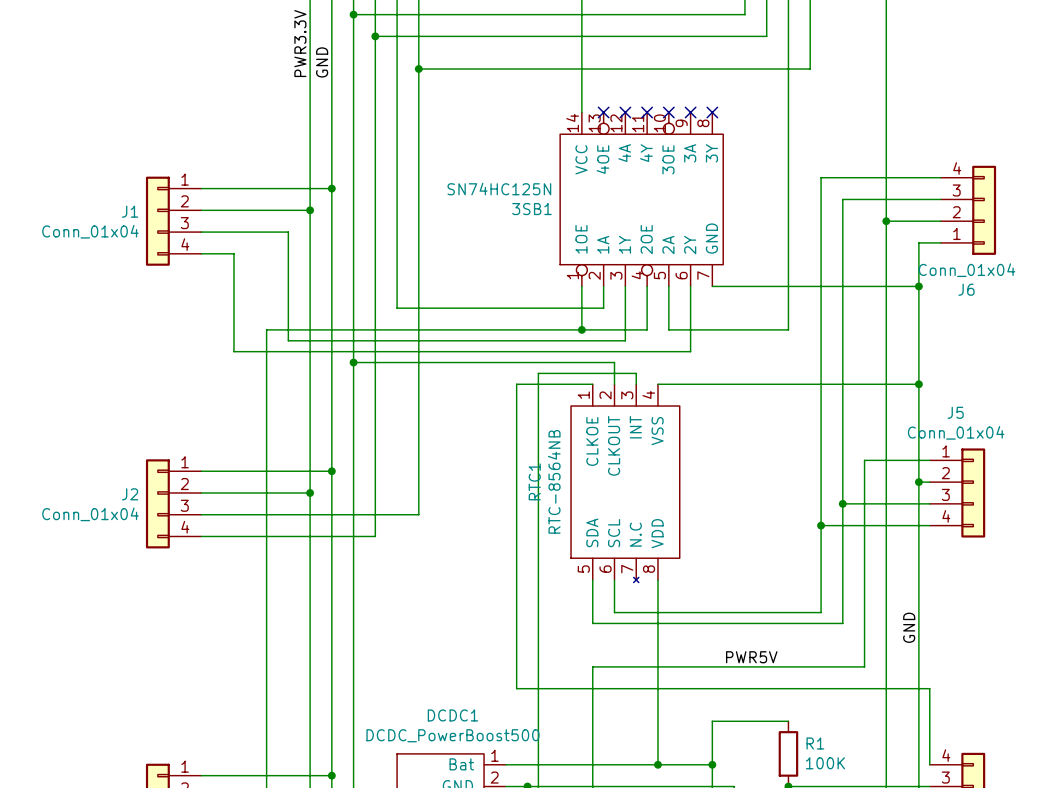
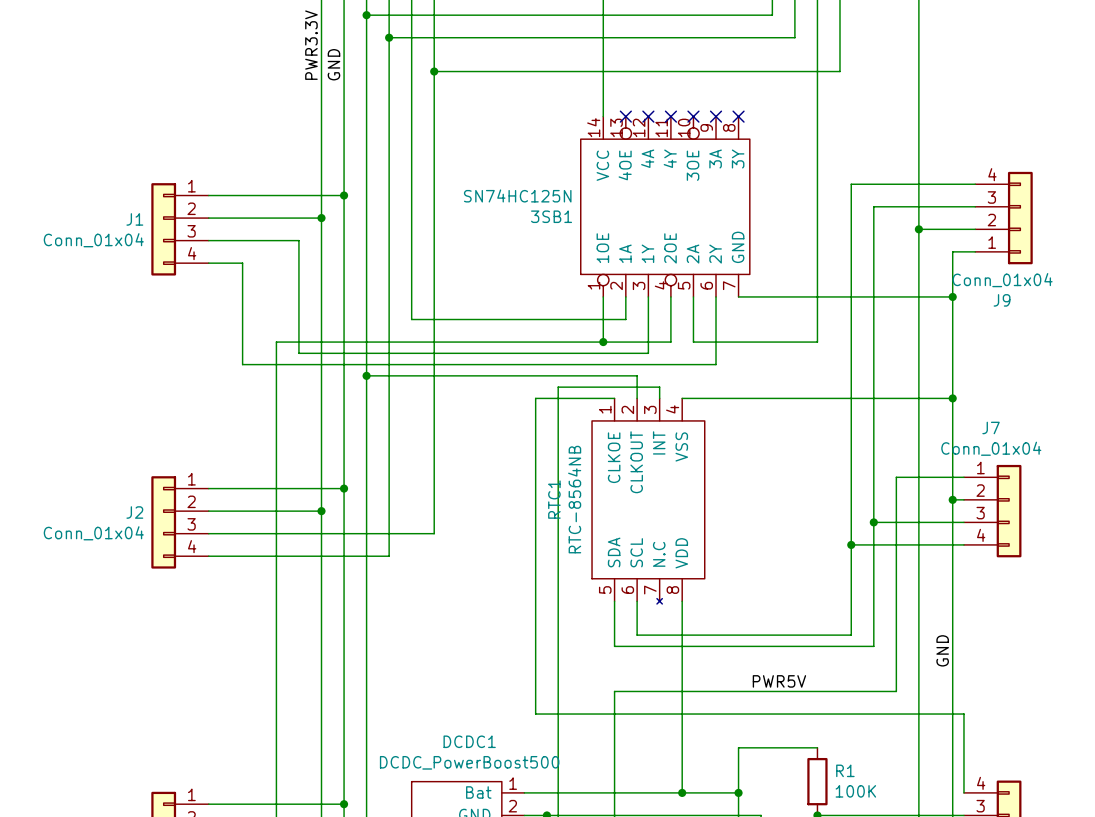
J6 name: J6 (966, 289) -> J9 (1002, 300)
J5 name: J5 (955, 412) -> J7 (991, 427)

